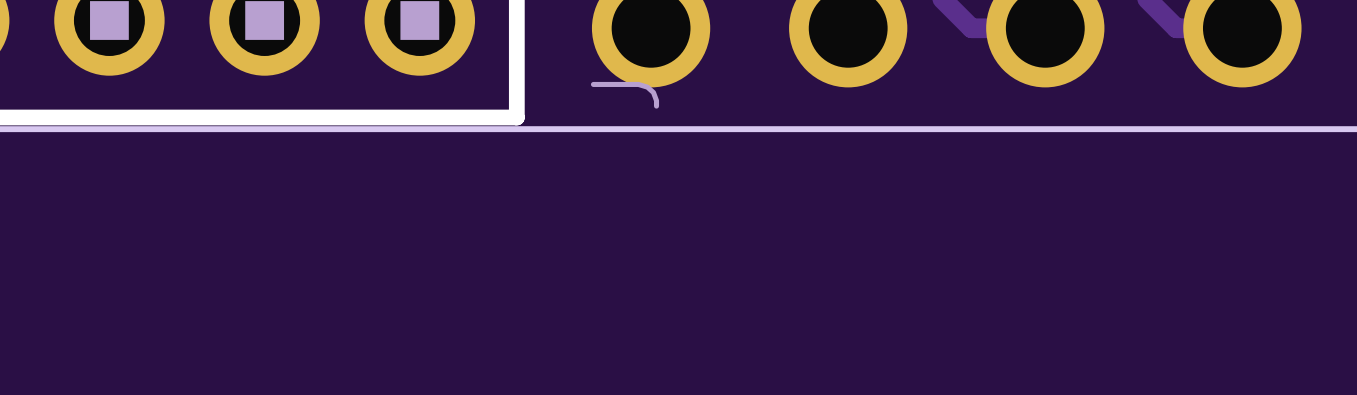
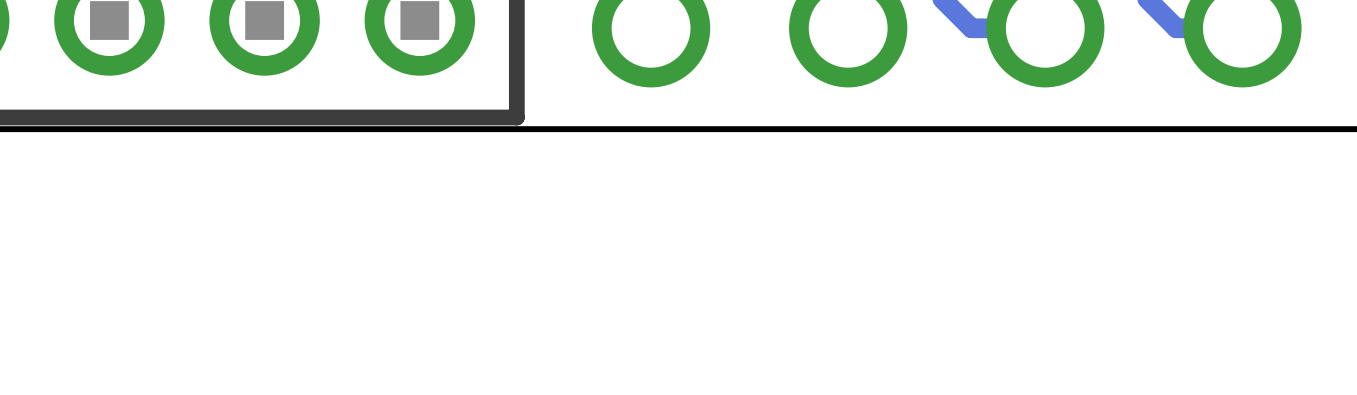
part value: J (624, 95) -> none

